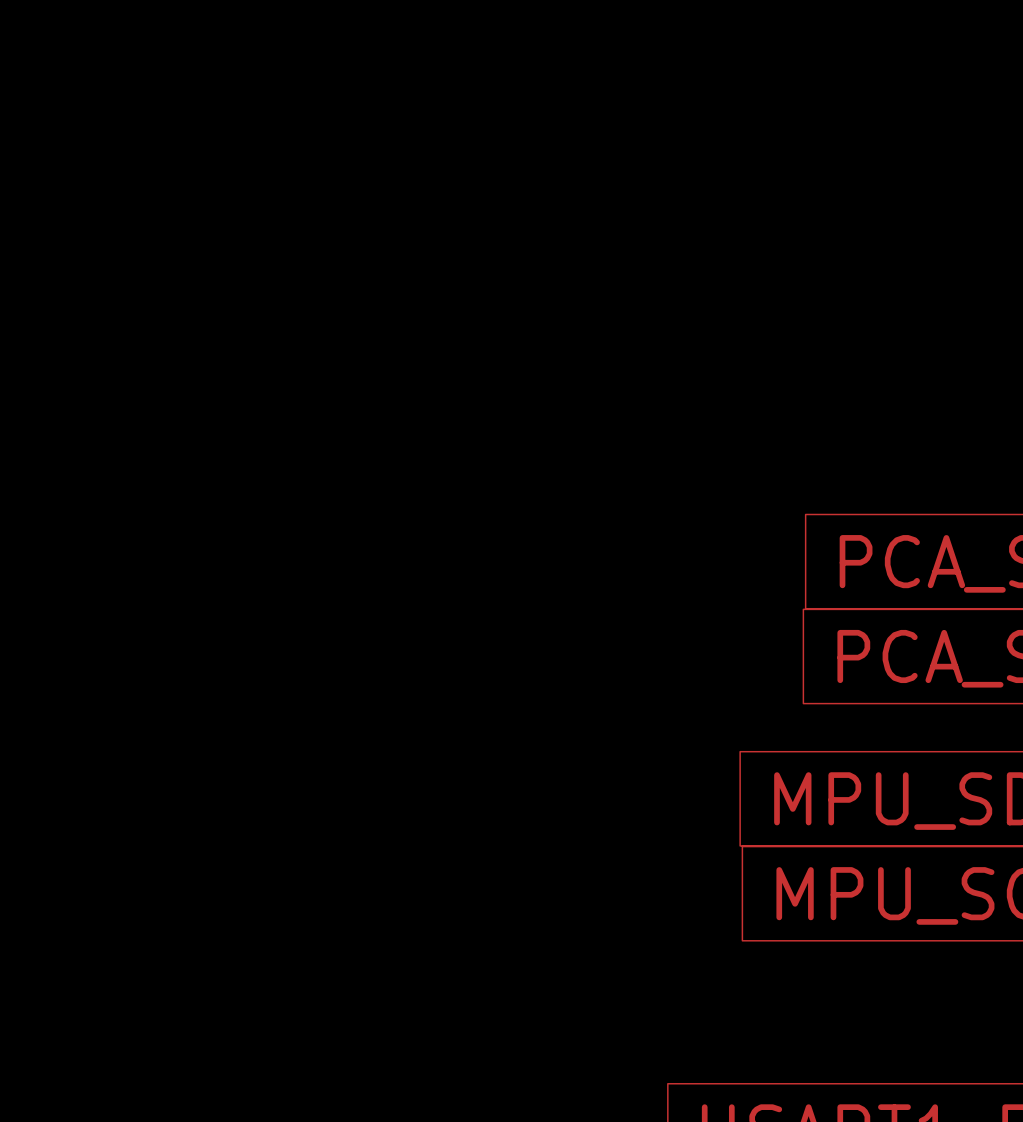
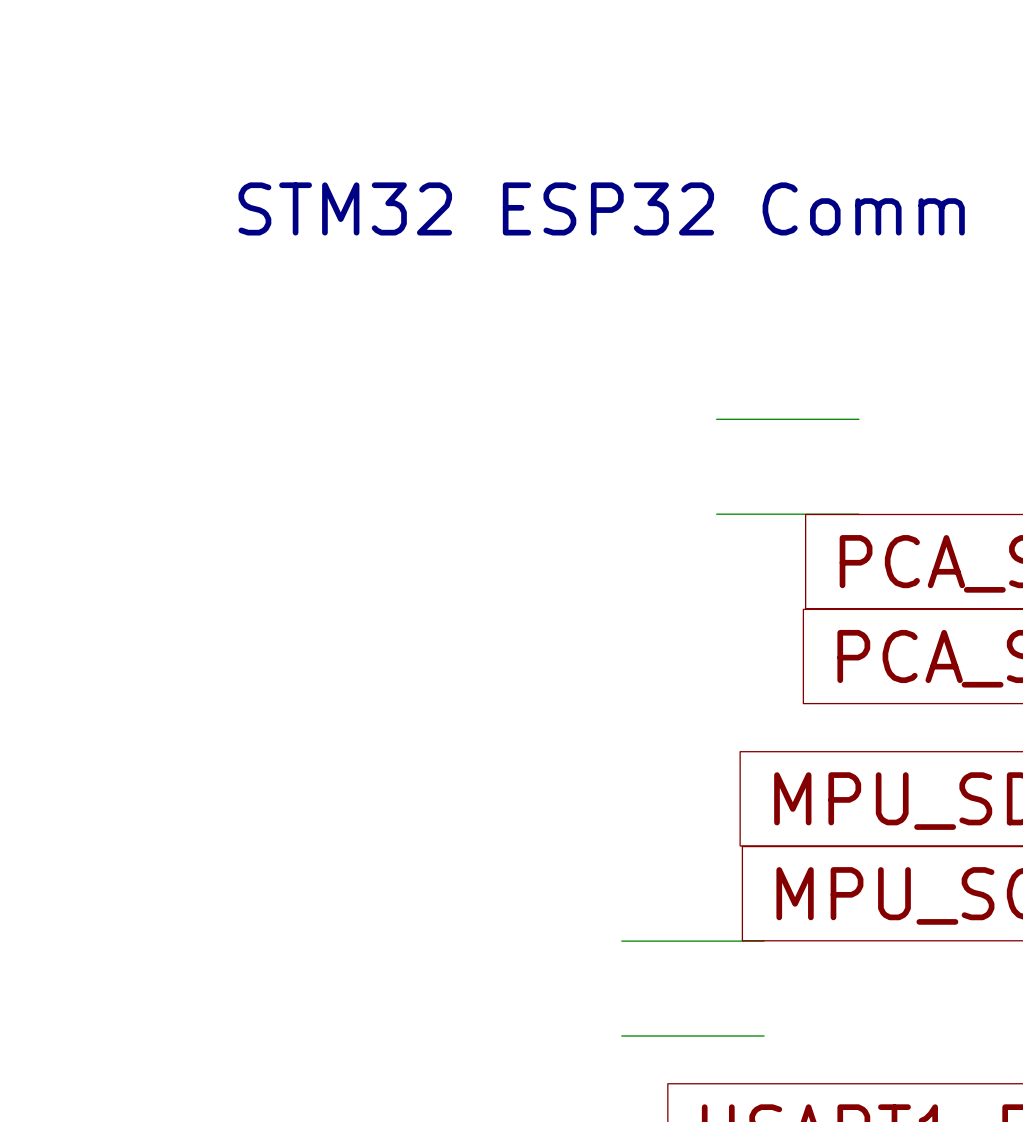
text: none -> STM32 ESP32 Comm (601, 208)
wire: none -> (716, 419) (858, 419)
wire: none -> (716, 514) (858, 514)
wire: none -> (621, 941) (764, 941)
wire: none -> (621, 1035) (764, 1035)

